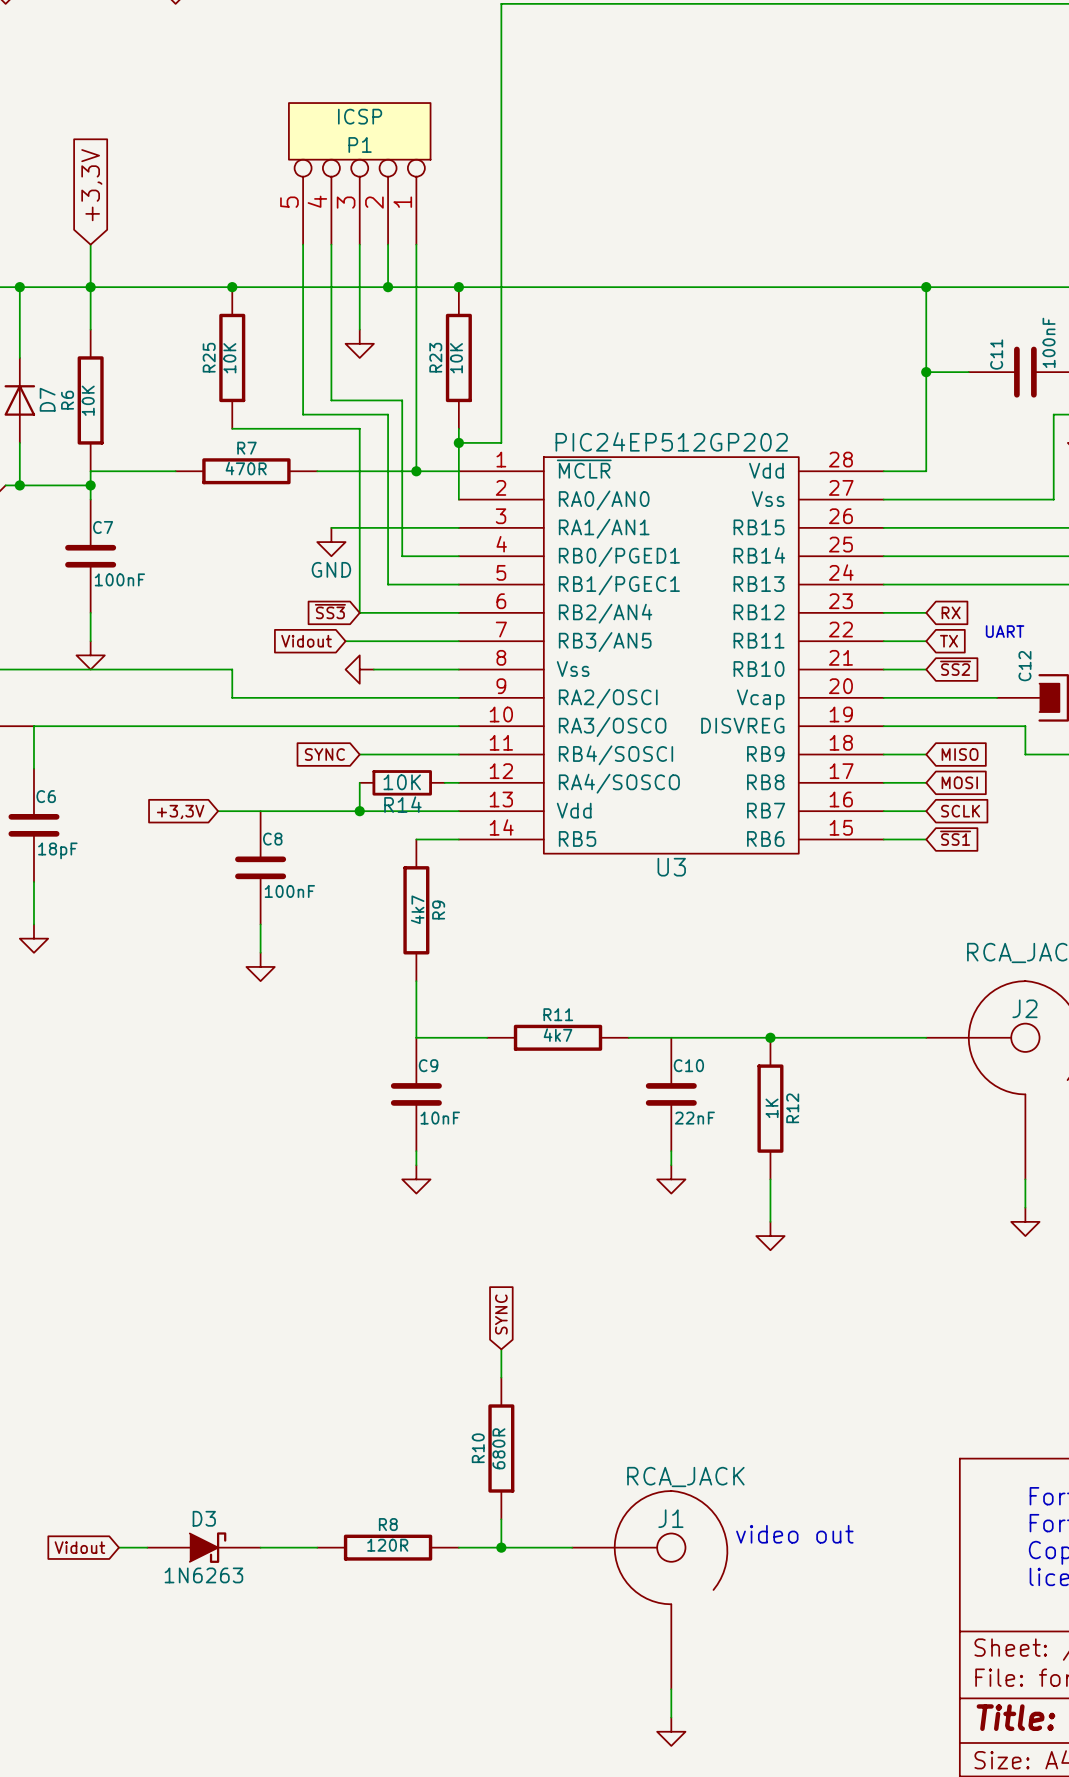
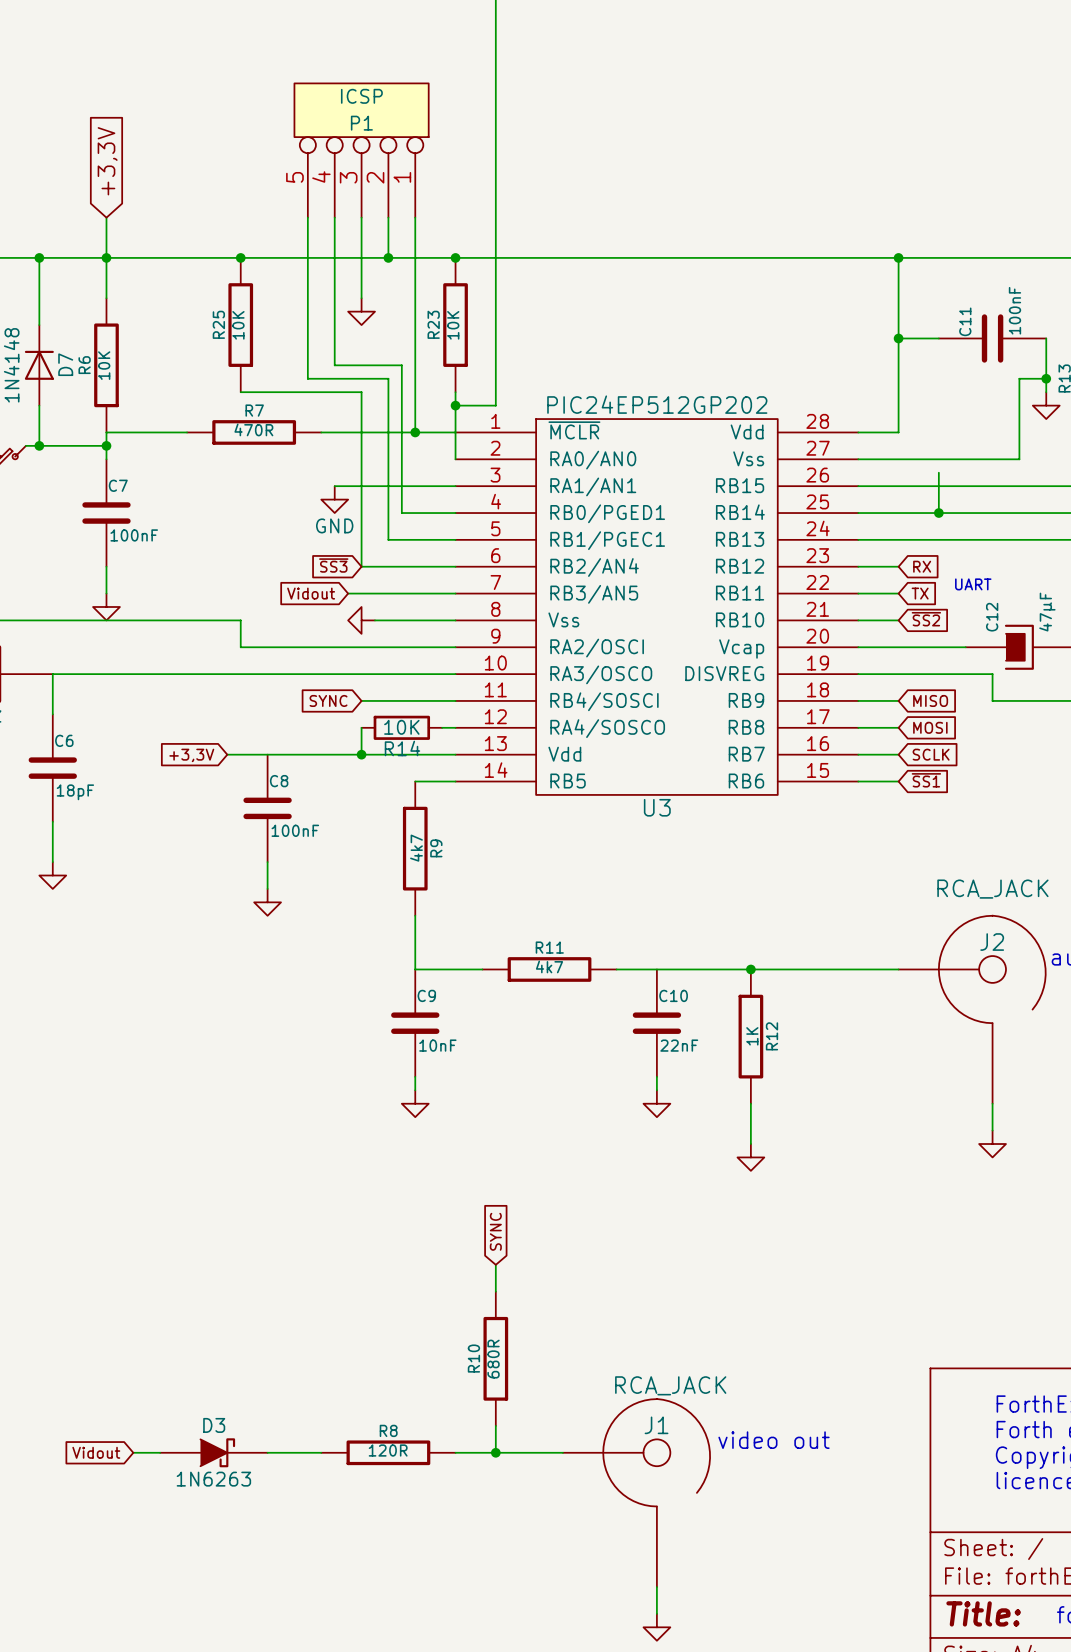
wire: none -> (938, 472) (938, 513)
junction: none -> (938, 513)

